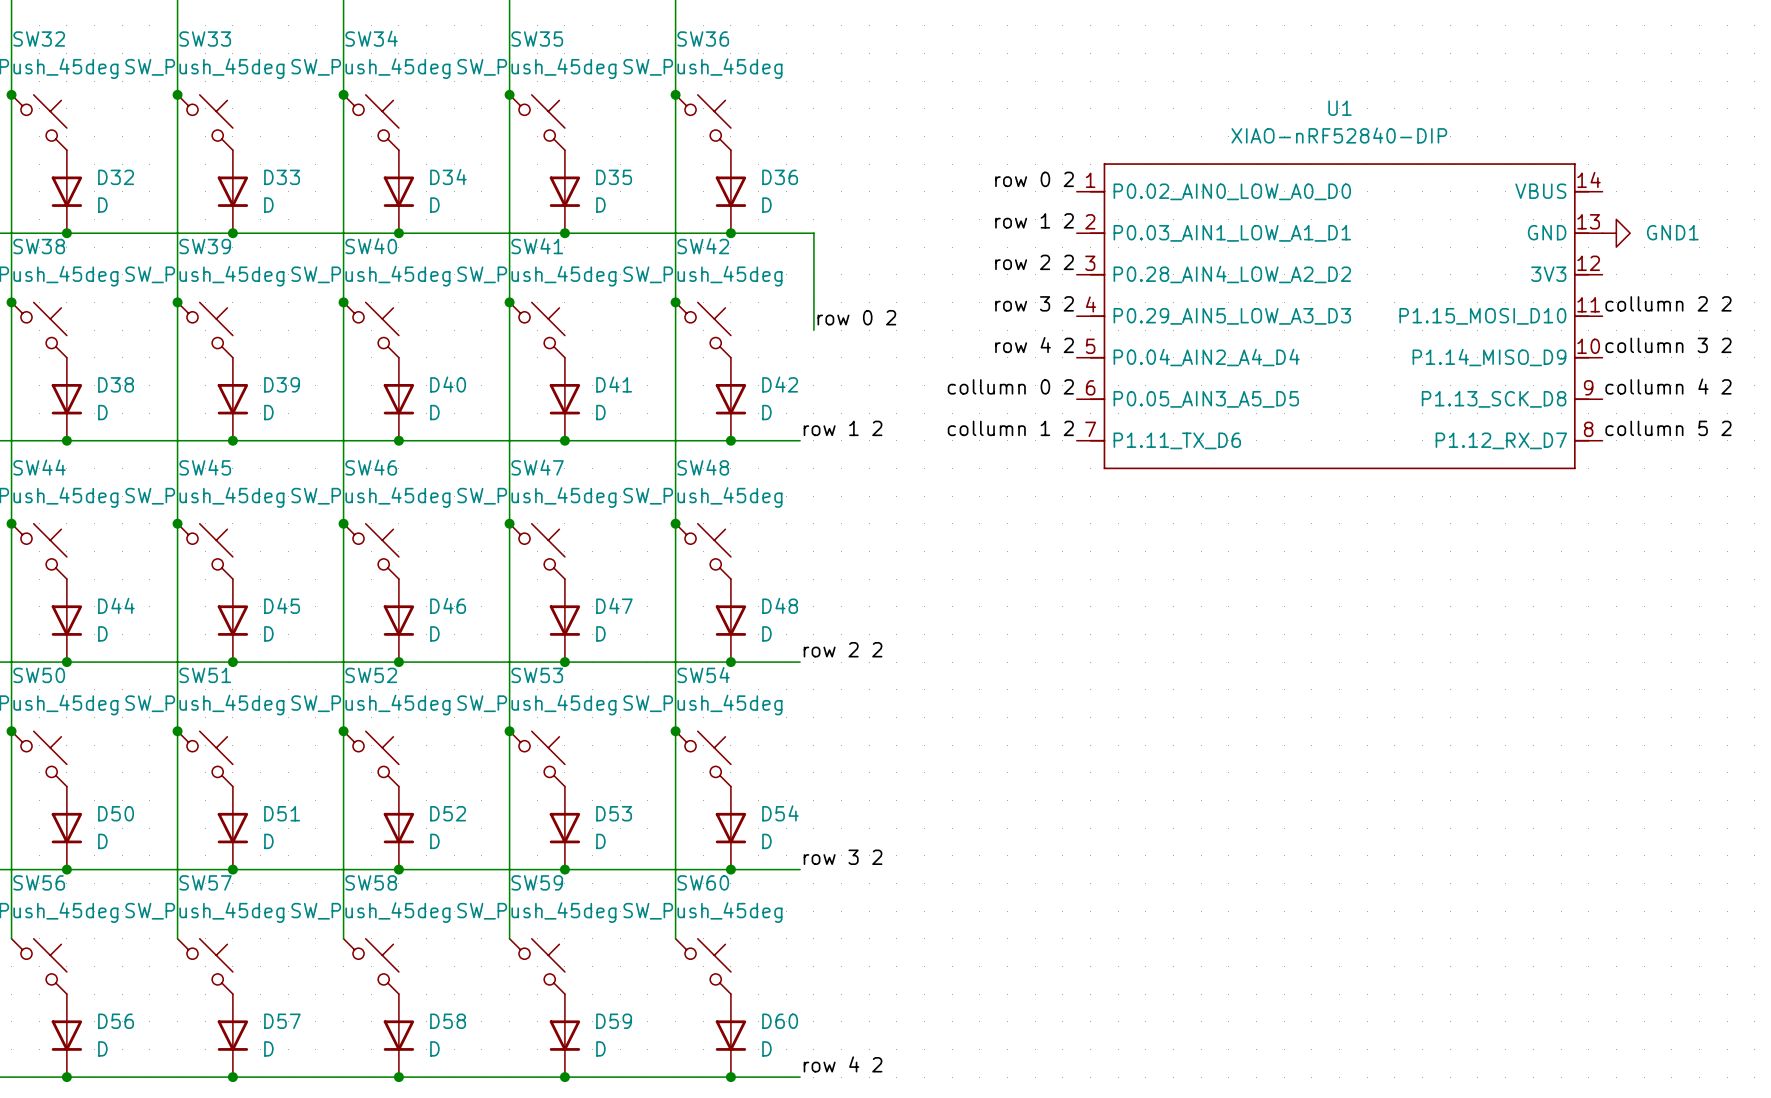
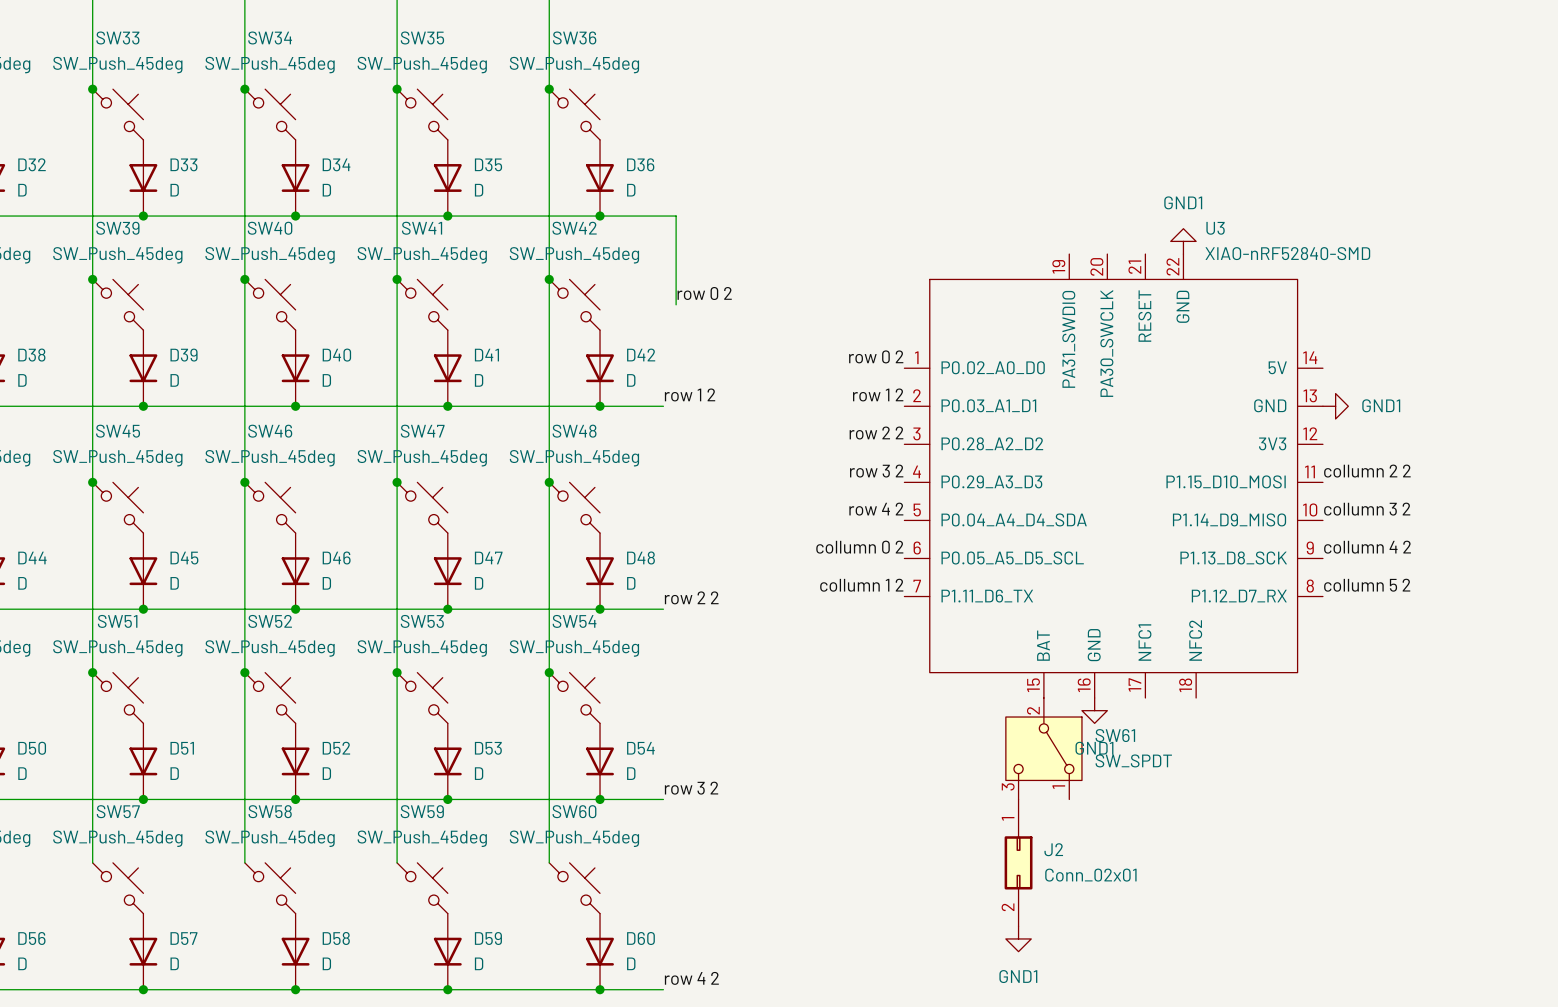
label position: row 0 2 (1034, 179) -> row 0 2 (876, 356)
label position: row 1 2 (1034, 220) -> row 1 2 (878, 394)
power symbol: GND1 (1616, 233) -> none
power symbol: none -> GND1 (1183, 241)
label position: row 2 2 (1034, 262) -> row 2 2 (876, 433)
label position: row 3 2 (1034, 303) -> row 3 2 (876, 471)
label position: collumn 2 2 (1668, 303) -> collumn 2 2 (1367, 471)
U1: XIAO-nRF52840-DIP (1339, 316) -> none
label position: row 4 2 (1034, 345) -> row 4 2 (876, 509)
label position: collumn 3 2 (1668, 345) -> collumn 3 2 (1367, 509)
label position: collumn 0 2 (1010, 386) -> collumn 0 2 (859, 547)
label position: collumn 4 2 (1668, 386) -> collumn 4 2 (1367, 547)
label position: collumn 1 2 (1010, 428) -> collumn 1 2 (861, 585)
label position: collumn 5 2 (1668, 428) -> collumn 5 2 (1367, 585)
power symbol: none -> GND1 (1335, 406)
U3: none -> XIAO-nRF52840-SMD (1113, 476)
power symbol: none -> GND1 (1094, 710)
SW61: none -> SW_SPDT (1043, 748)
J2: none -> Conn_02x01 (1018, 862)
power symbol: none -> GND1 (1018, 938)

